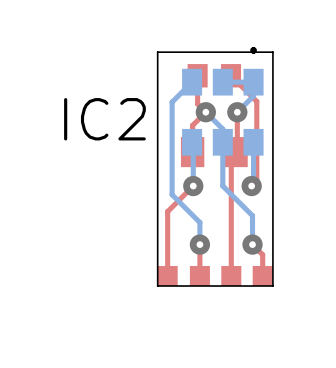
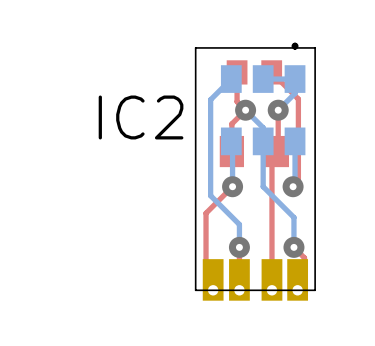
part footprint: [157, 265, 178, 287] -> [202, 259, 224, 301]
part footprint: [189, 265, 210, 287] -> [229, 259, 250, 301]
part footprint: [221, 265, 242, 287] -> [261, 259, 283, 301]
part footprint: [252, 265, 273, 287] -> [287, 259, 309, 301]

